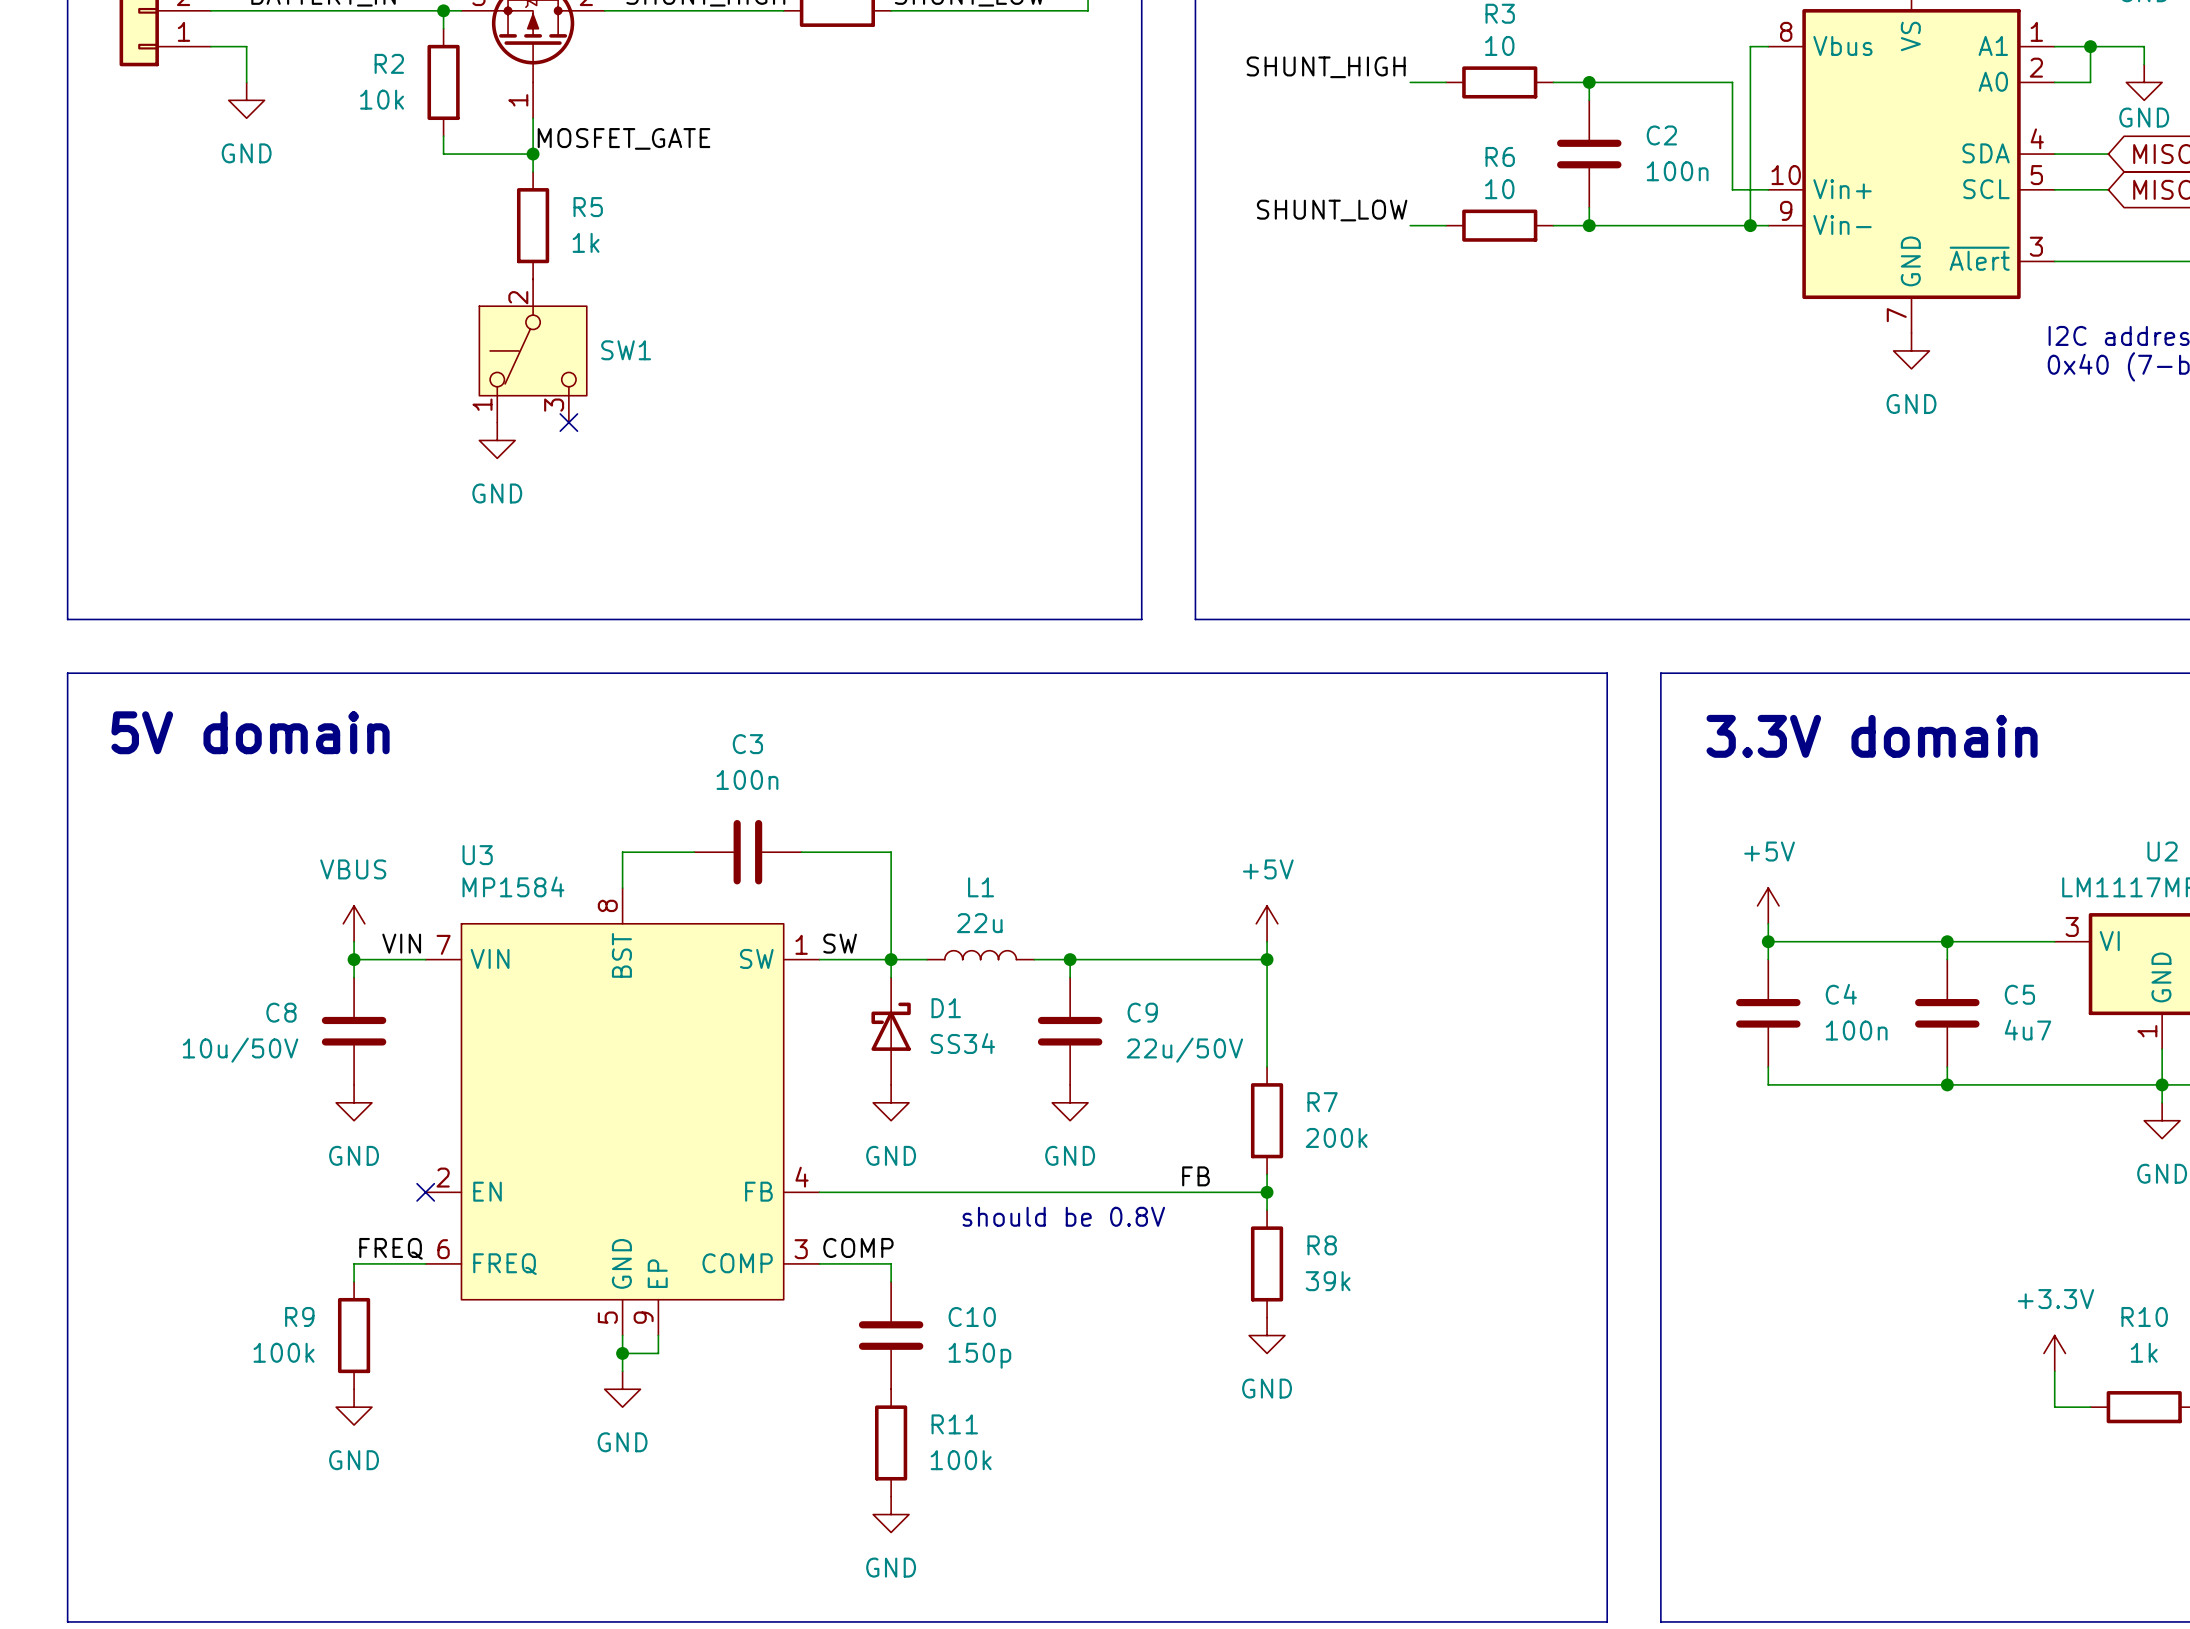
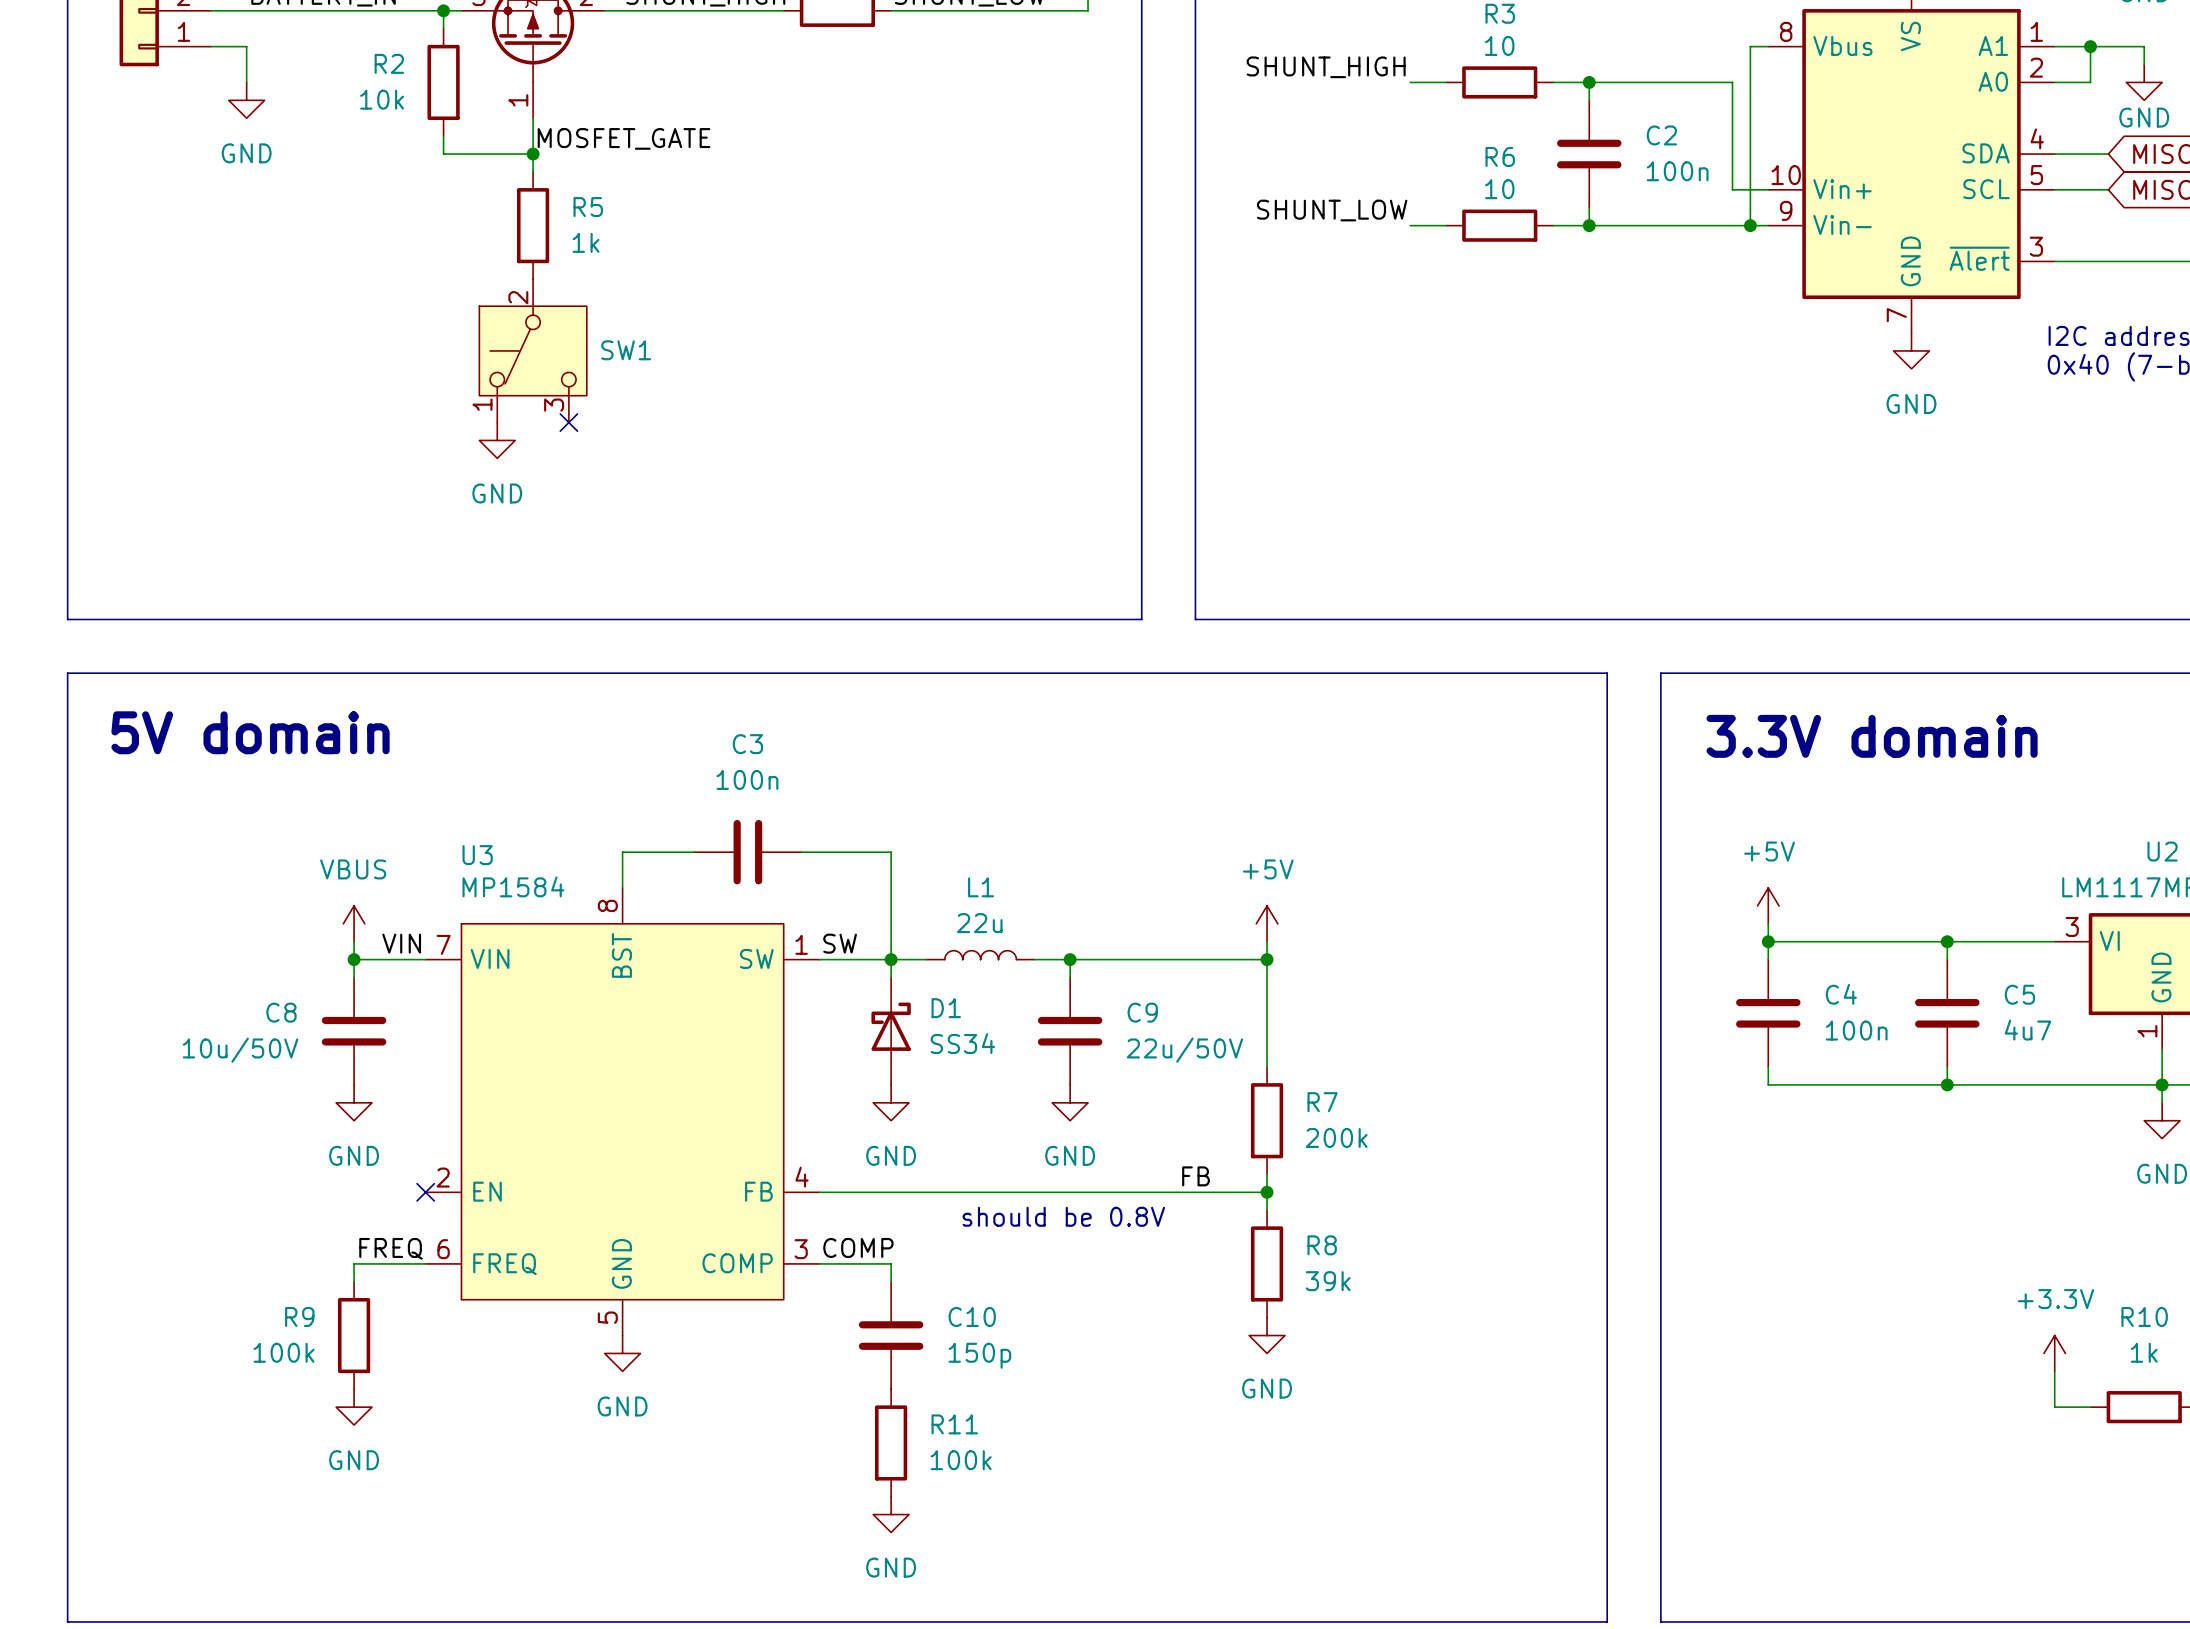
U3 symbol: [425, 888, 820, 1336] -> [425, 888, 820, 1336]
wire: (658, 1335) (658, 1353) (622, 1353) -> none
junction: (622, 1353) -> none
power symbol position: GND (622, 1389) -> GND (622, 1353)

